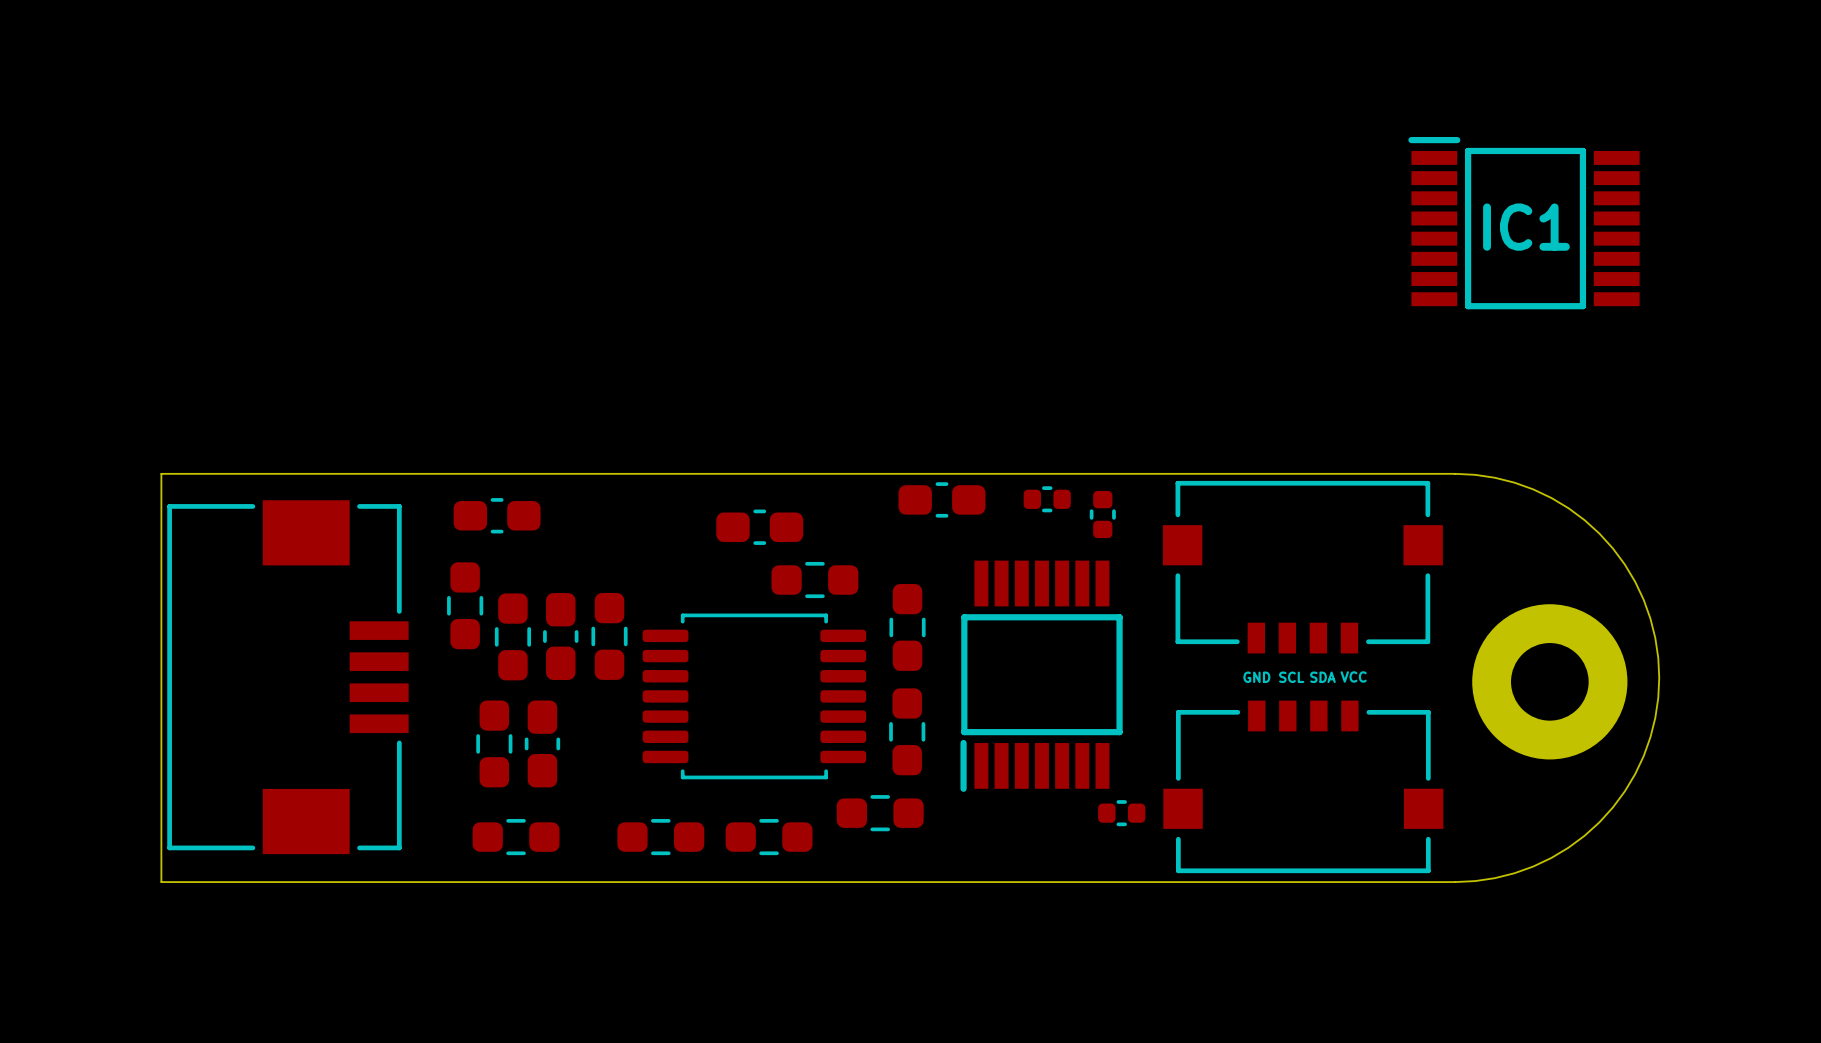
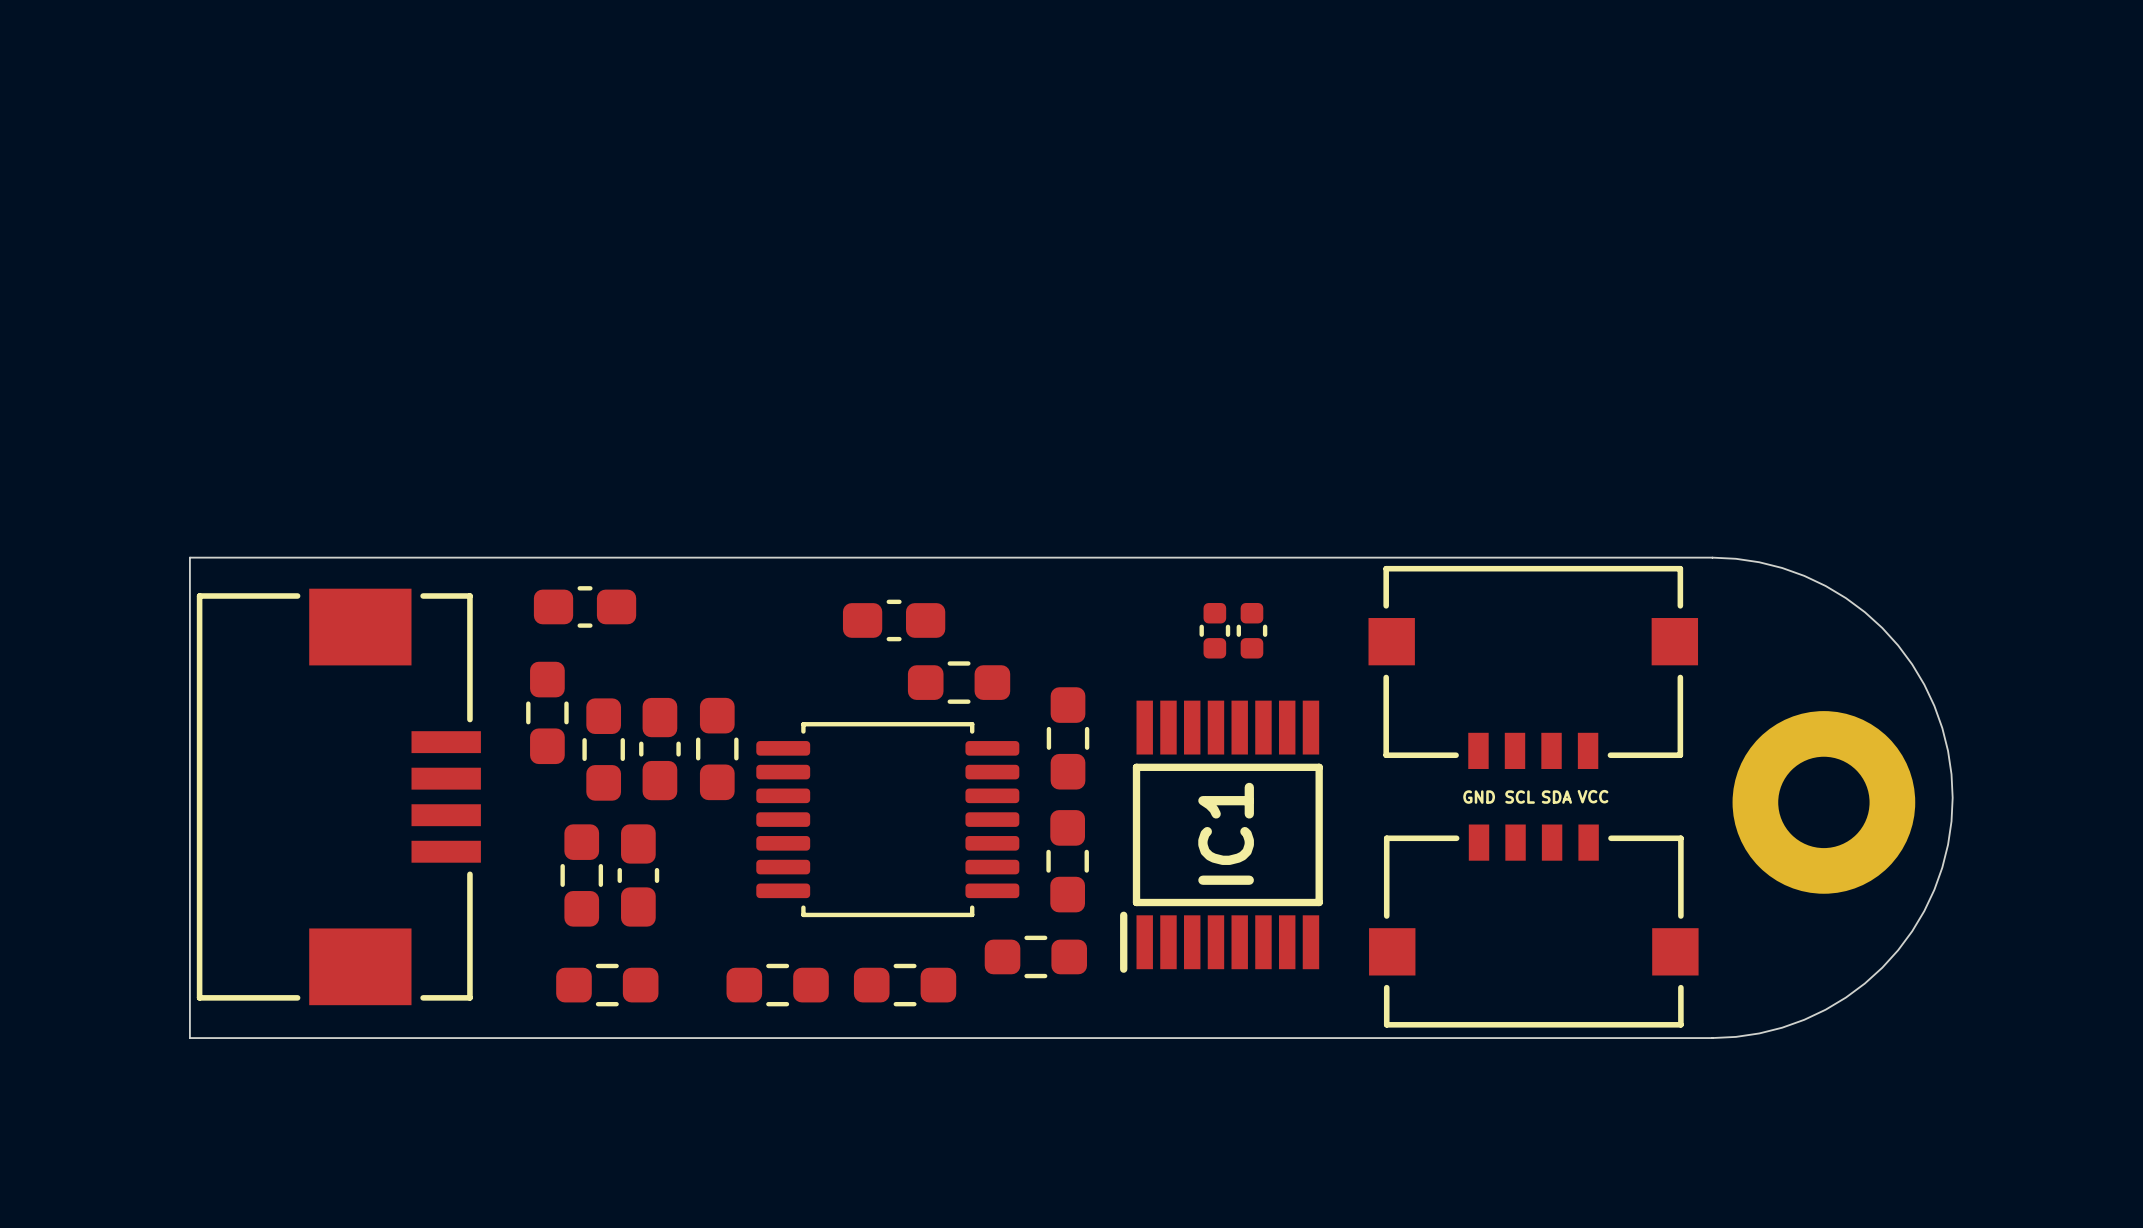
IC1 rotation: 0° (1523, 223) -> 90° counterclockwise (1221, 836)
IC1 position: (1523, 223) -> (1221, 836)
part: (941, 499) -> none
part: (1047, 499) -> none
part: (1102, 514) -> none
part: none -> (1214, 630)
part: none -> (1251, 630)
part: (1041, 676) -> none
part: (1121, 813) -> none

